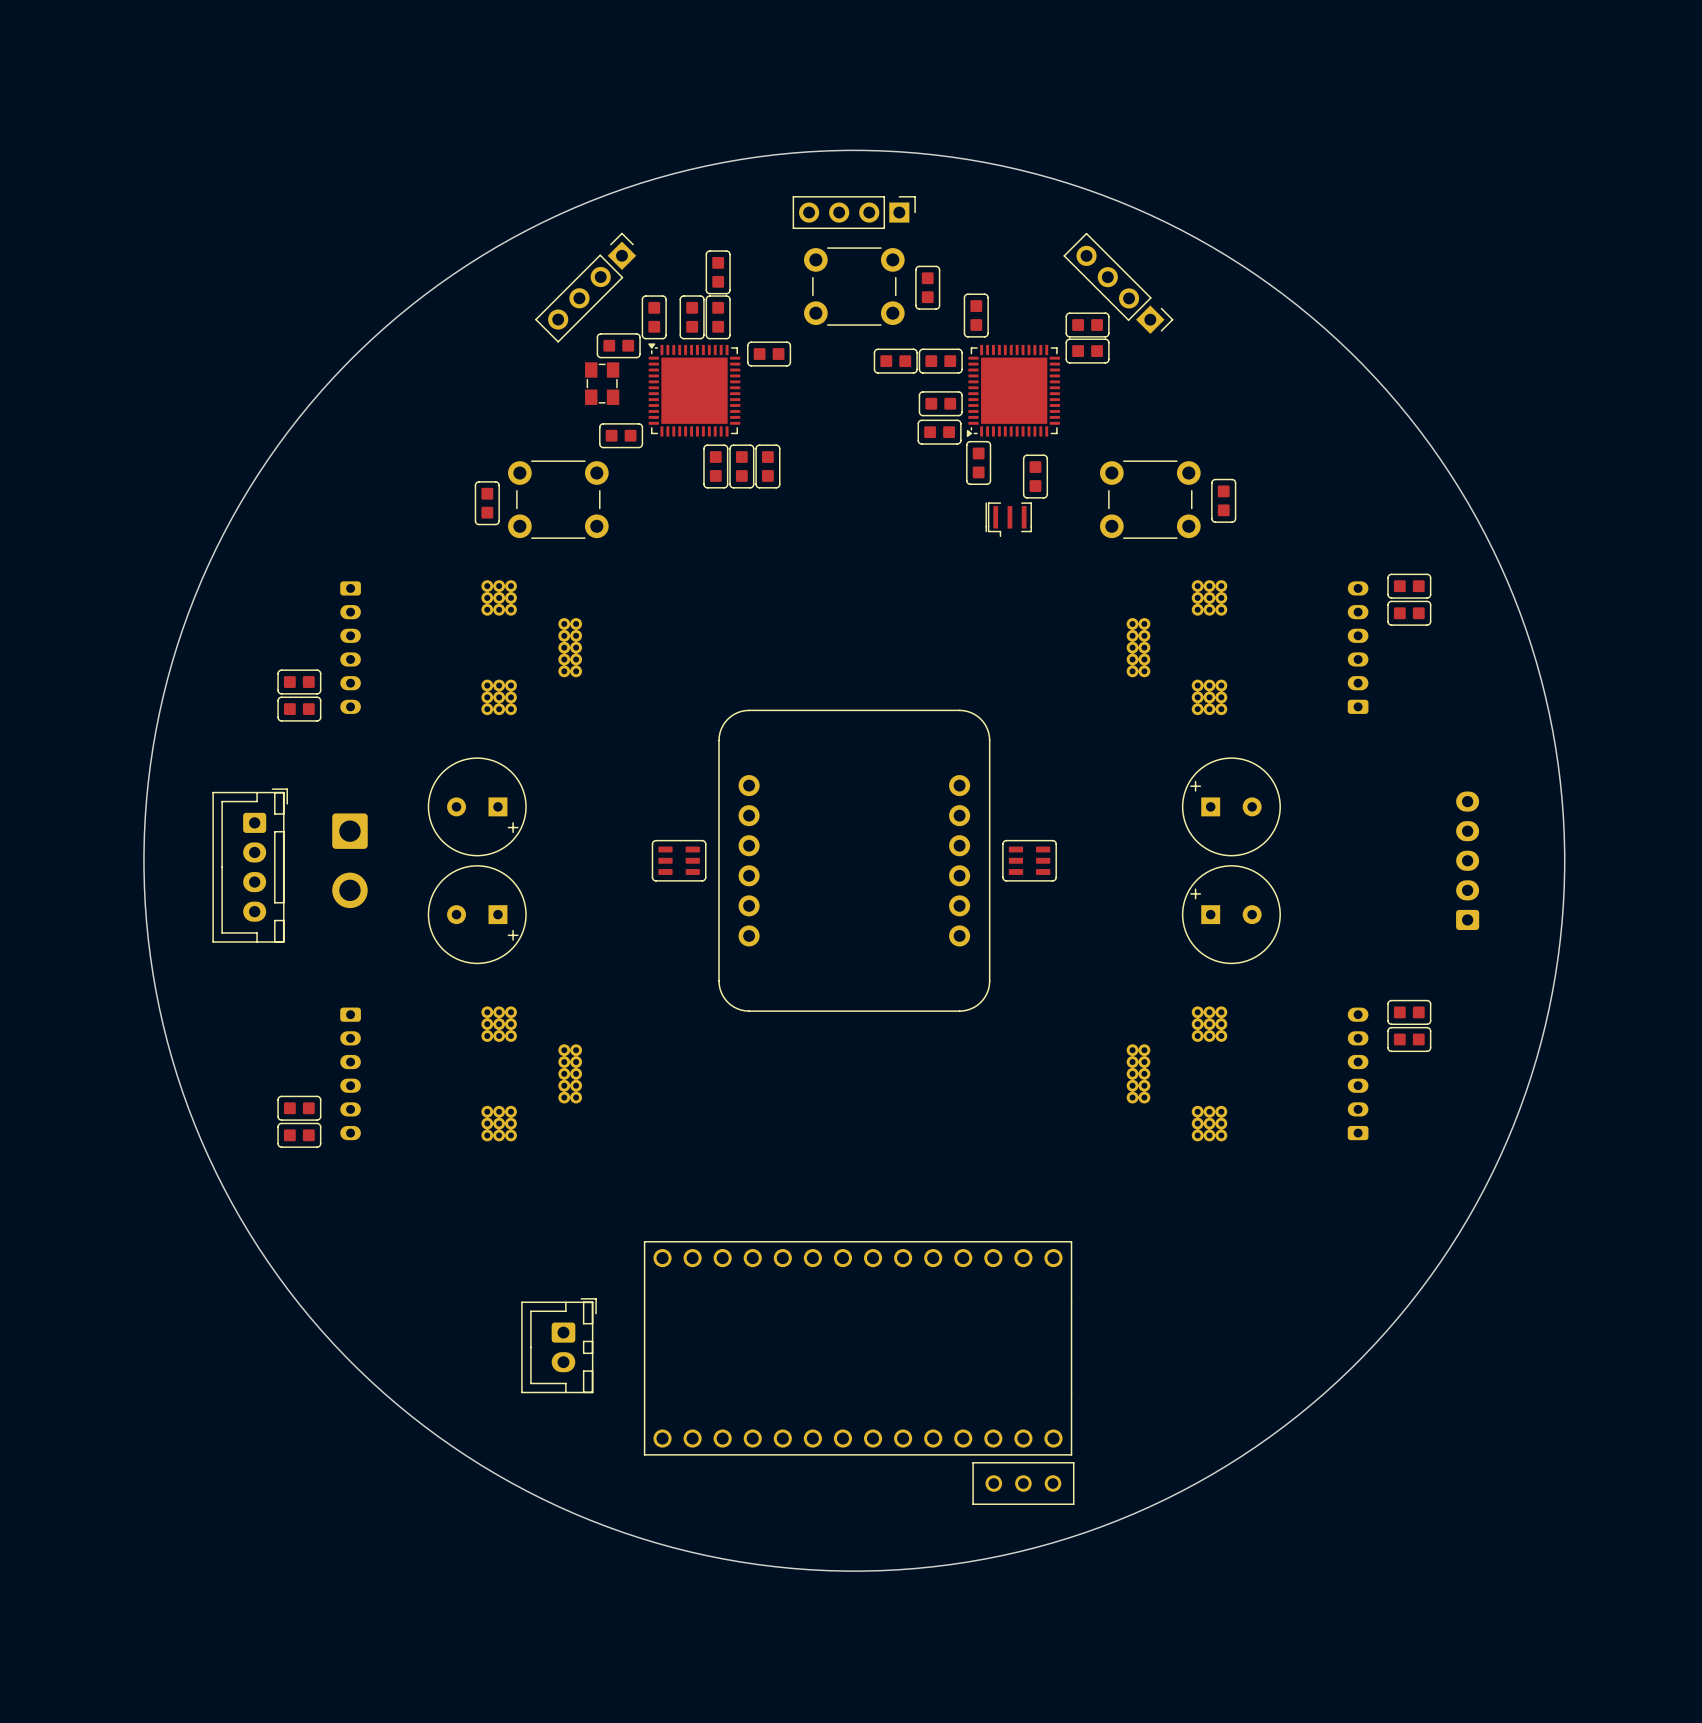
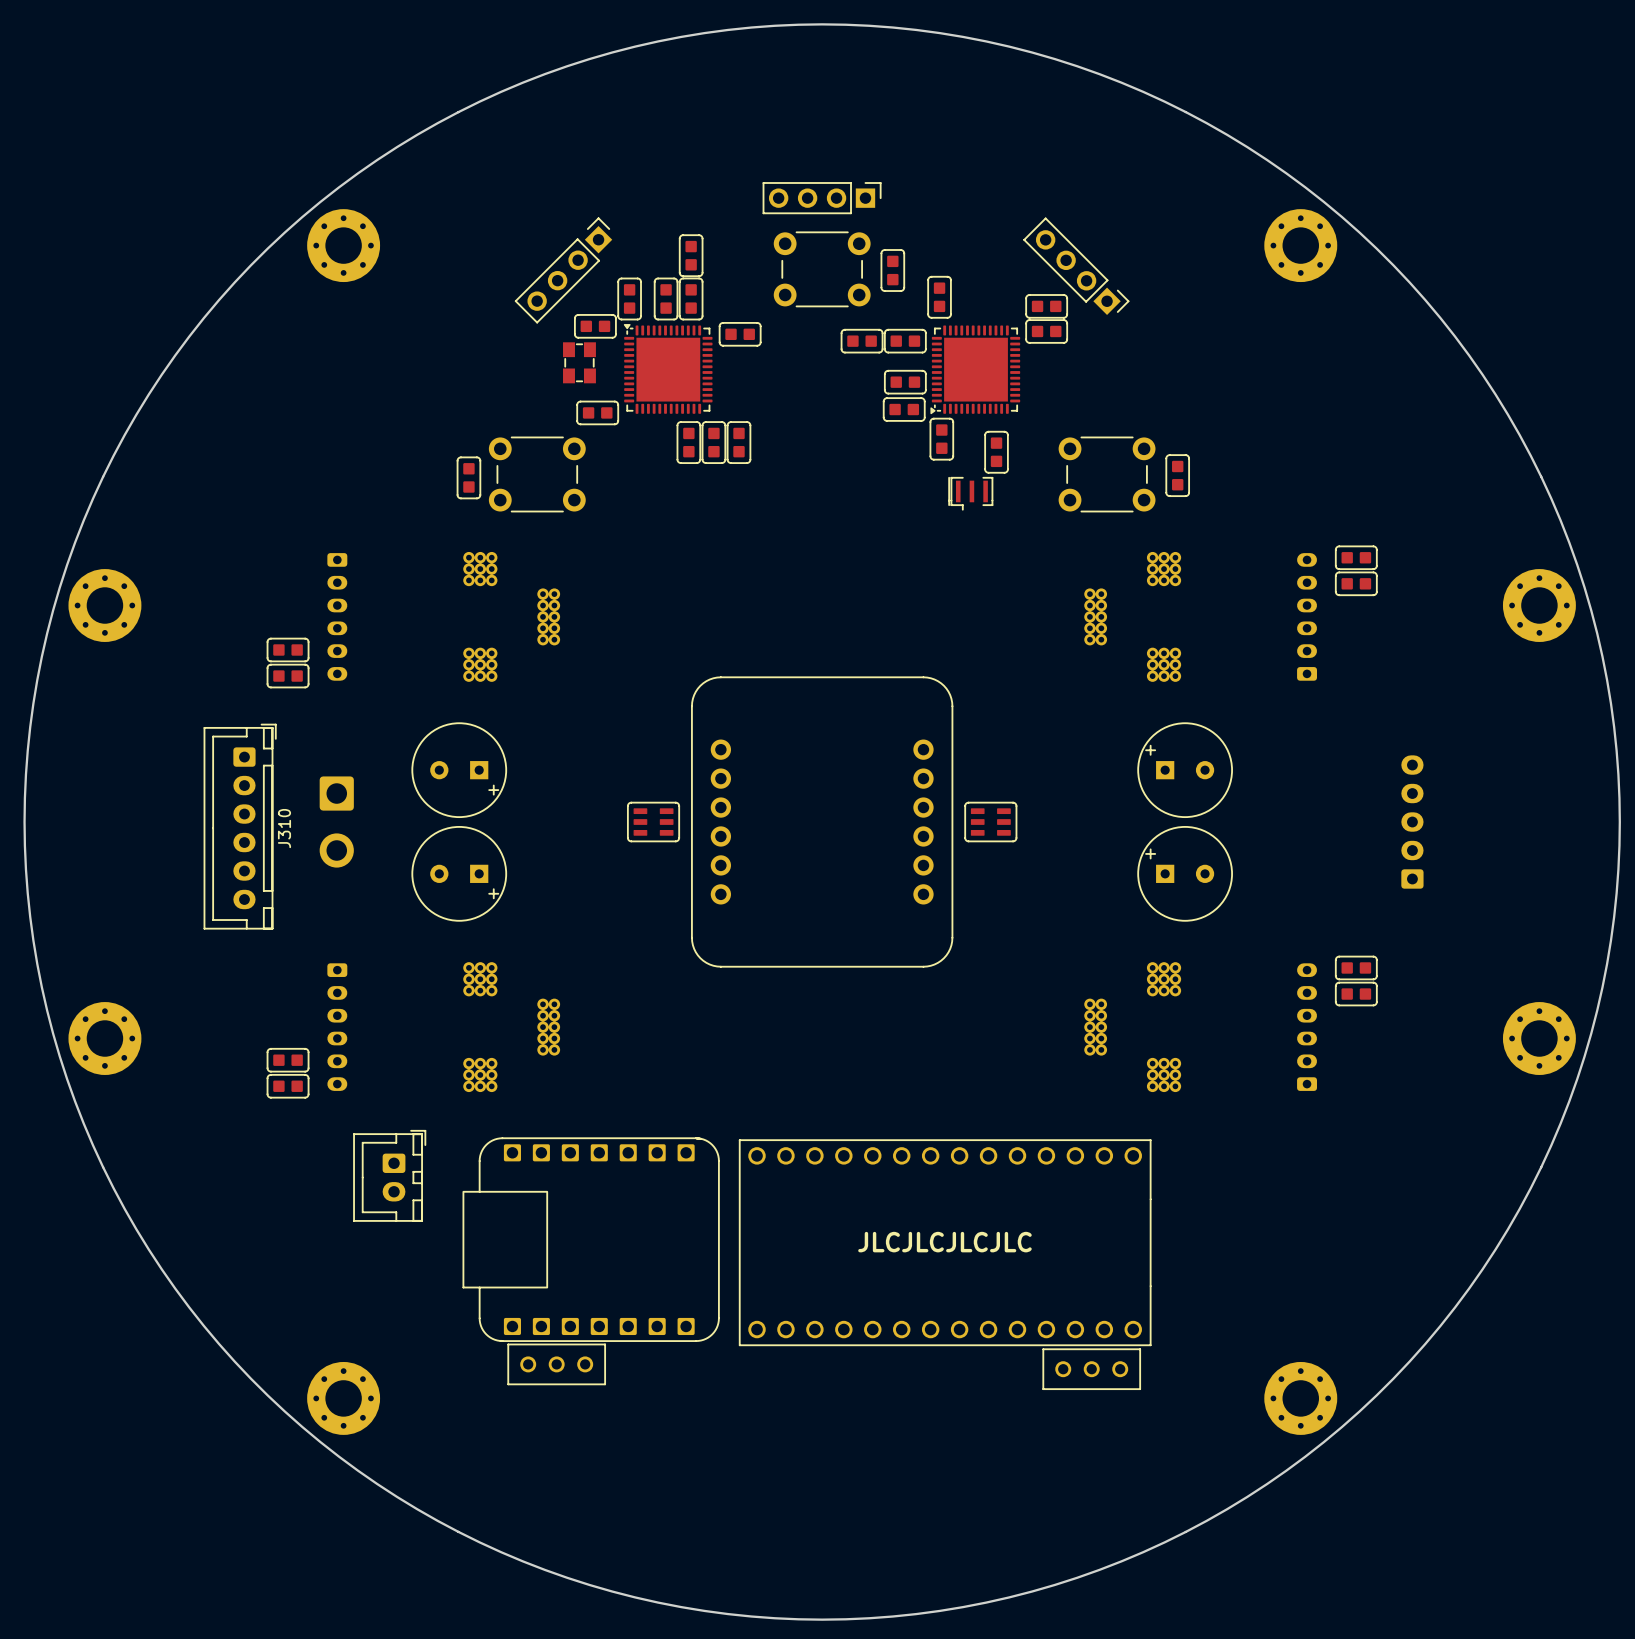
board edge: none -> (458, 112) (522, 82) (589, 59) (658, 41) (751, 27) (822, 24) (892, 27) (963, 36) (1054, 59) (1121, 82) (1185, 112) (1266, 159) (1323, 201) (1376, 248) (1440, 318) (1495, 394) (1530, 455) (1569, 542) (1591, 610) (1607, 679) (1616, 750) (1619, 822) (1614, 916) (1602, 987) (1584, 1056) (1560, 1123) (1530, 1188) (1495, 1249) (1440, 1325) (1393, 1378) (1323, 1442) (1266, 1484) (1185, 1531) (1121, 1561) (1054, 1584) (986, 1602) (892, 1616) (822, 1619) (728, 1614) (658, 1602) (589, 1584) (522, 1561) (458, 1531) (377, 1484) (320, 1442) (250, 1378) (203, 1325) (148, 1249) (113, 1188) (75, 1101) (53, 1033) (37, 964) (27, 893) (24, 822) (30, 727) (41, 656) (59, 587) (83, 520) (113, 455) (161, 374) (203, 318) (267, 248) (320, 201) (397, 147) (458, 112)
round board edge: [143, 149, 1566, 1572] -> none
part: none -> (343, 245)
part: none -> (1300, 245)
part: none -> (104, 605)
part: none -> (1539, 605)
J310: none -> (240, 826)
part: (250, 865) -> none
part: none -> (104, 1038)
part: none -> (1539, 1038)
part: none -> (591, 1239)
text: none -> JLCJLCJLCJLC (944, 1242)
part position: (559, 1345) -> (389, 1175)
part position: (858, 1348) -> (945, 1242)
part: none -> (556, 1364)
part: none -> (343, 1398)
part: none -> (1300, 1398)
part position: (1023, 1483) -> (1091, 1369)

